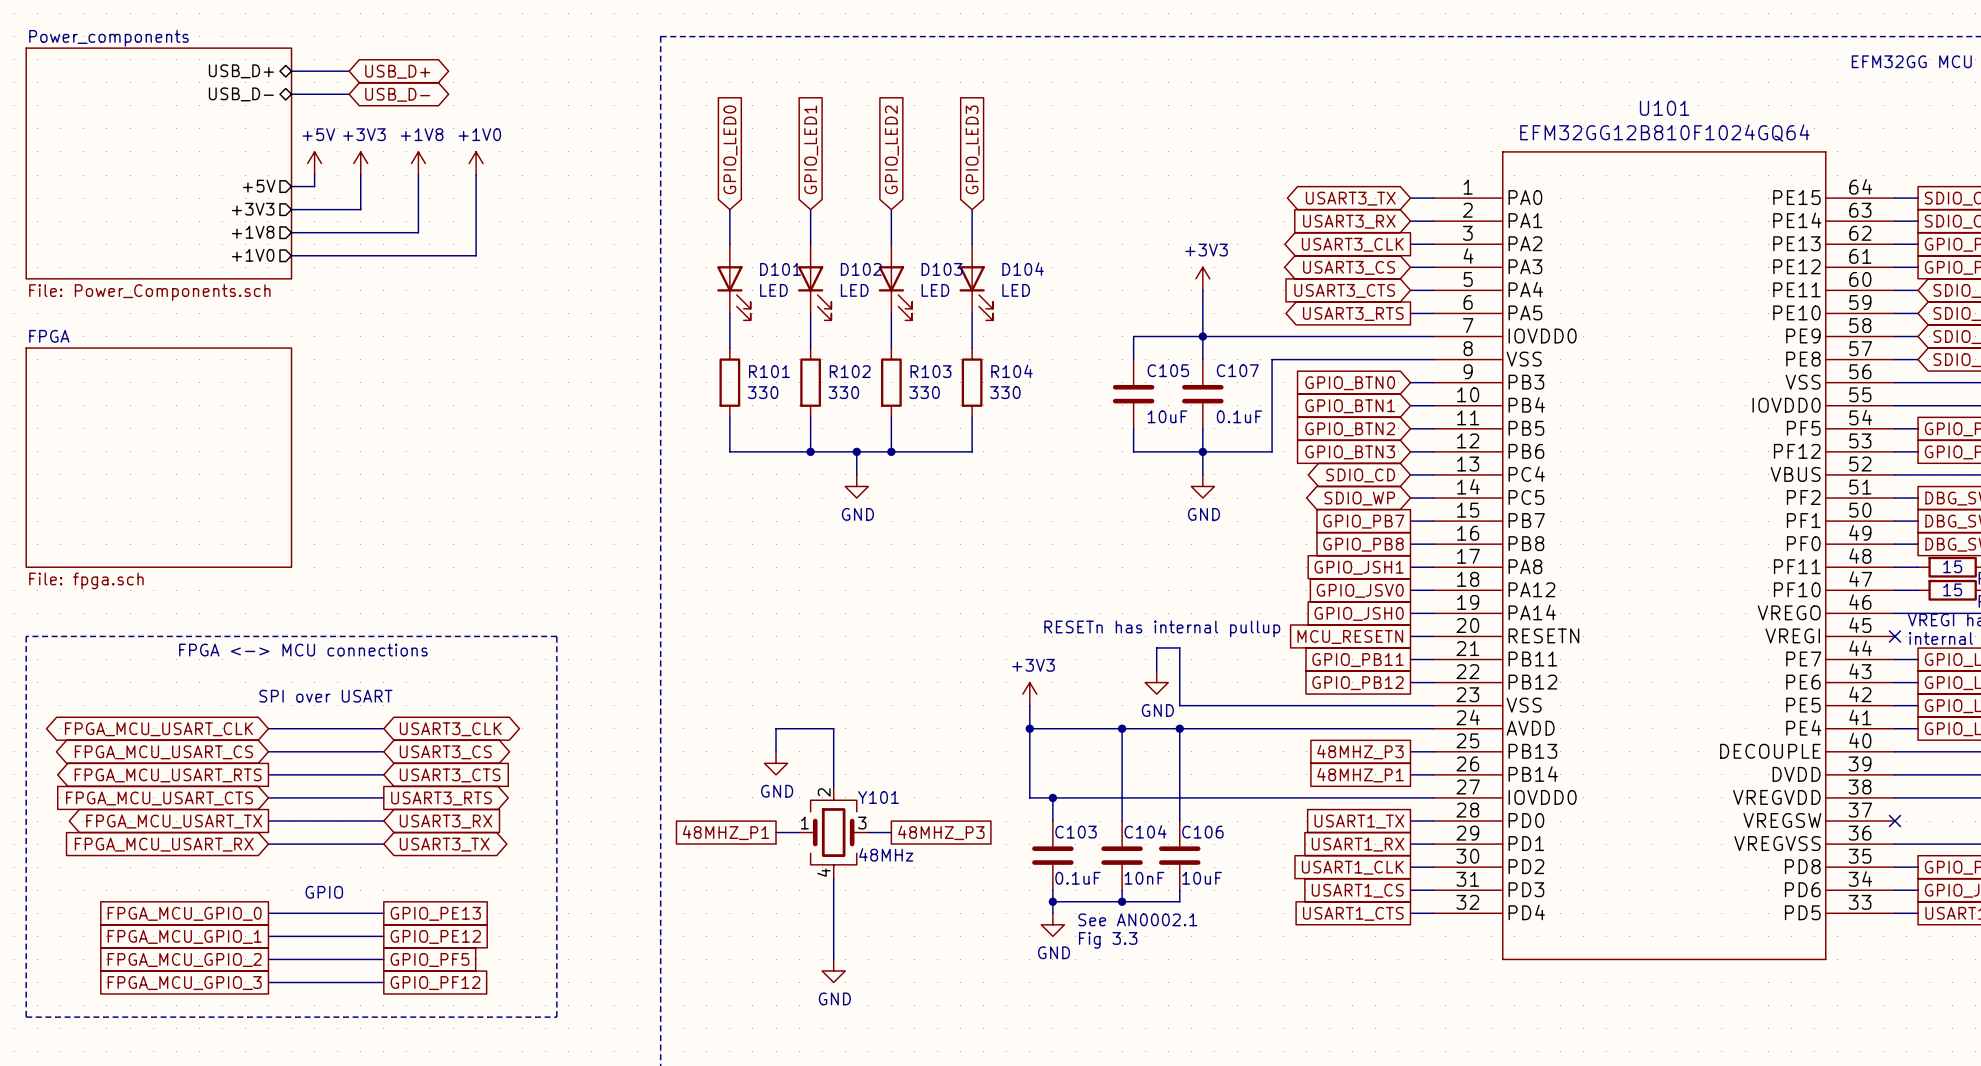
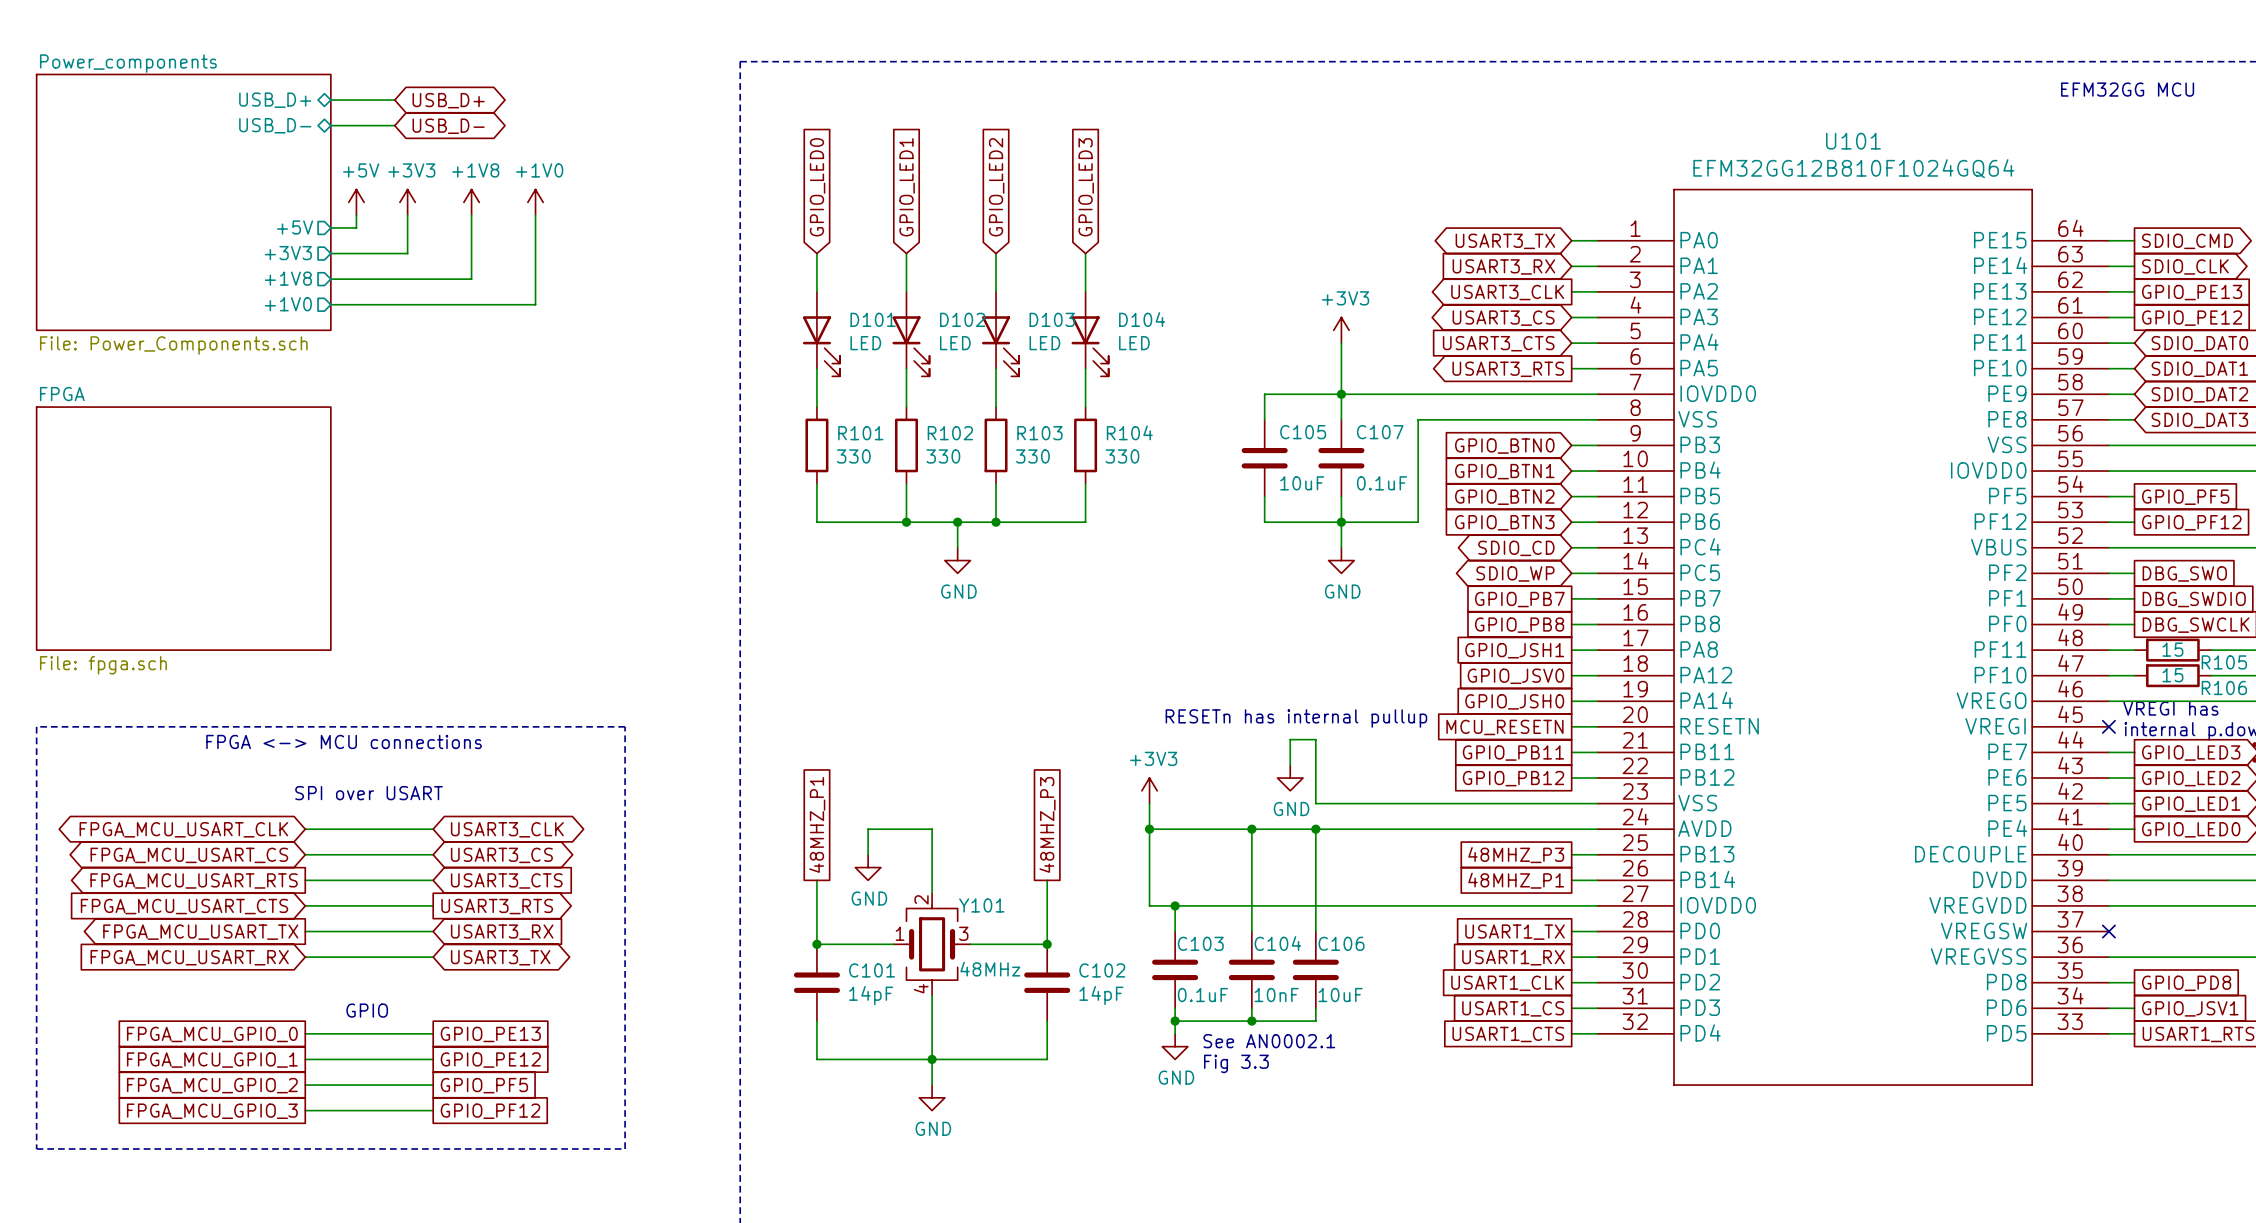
wire: none -> (816, 880) (816, 944) (868, 944)
wire: none -> (1047, 880) (1047, 944) (996, 944)
global label rotation: 0° (726, 832) -> 90° clockwise (817, 824)
junction: none -> (816, 944)
junction: none -> (1047, 944)
global label rotation: 0° (941, 832) -> 90° counterclockwise (1047, 824)
C101: none -> 14pF (816, 982)
C102: none -> 14pF (1047, 982)
wire: none -> (816, 1021) (816, 1059) (1047, 1059) (1047, 1021)
junction: none -> (932, 1059)

